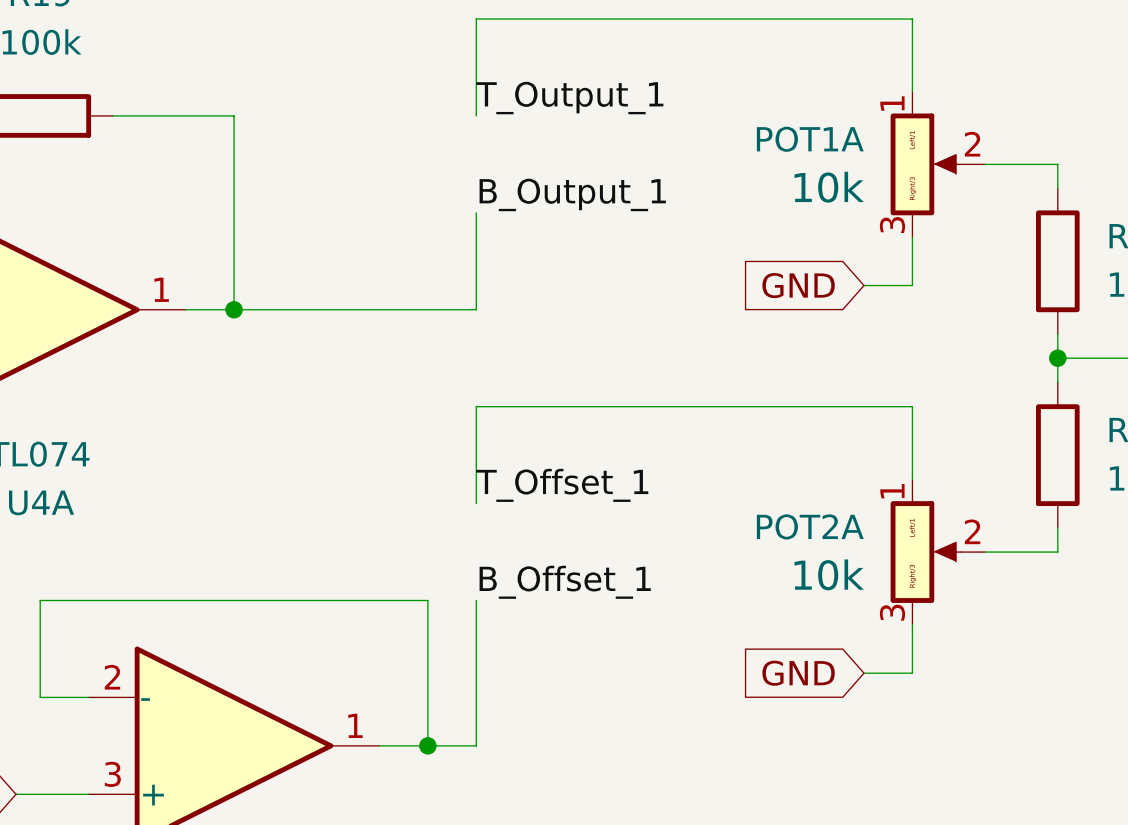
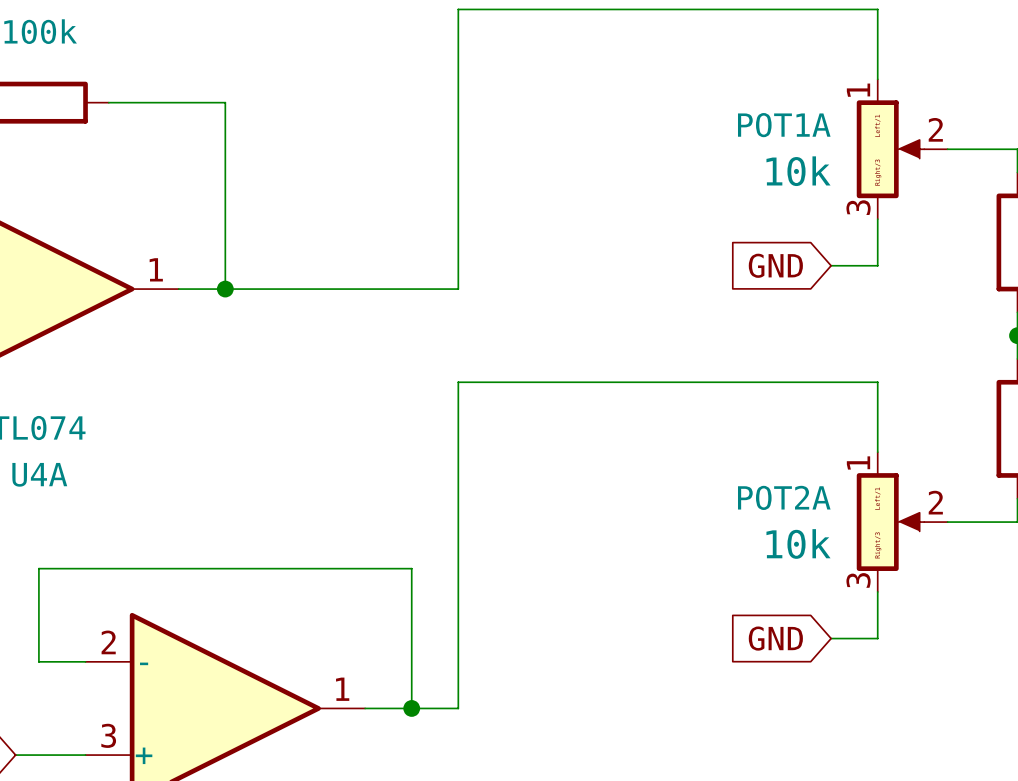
label: T_Output_1 (569, 98) -> none
wire: none -> (458, 102) (458, 195)
label: B_Output_1 (572, 194) -> none
label: T_Offset_1 (562, 485) -> none
wire: none -> (458, 475) (458, 568)
label: B_Offset_1 (565, 582) -> none

